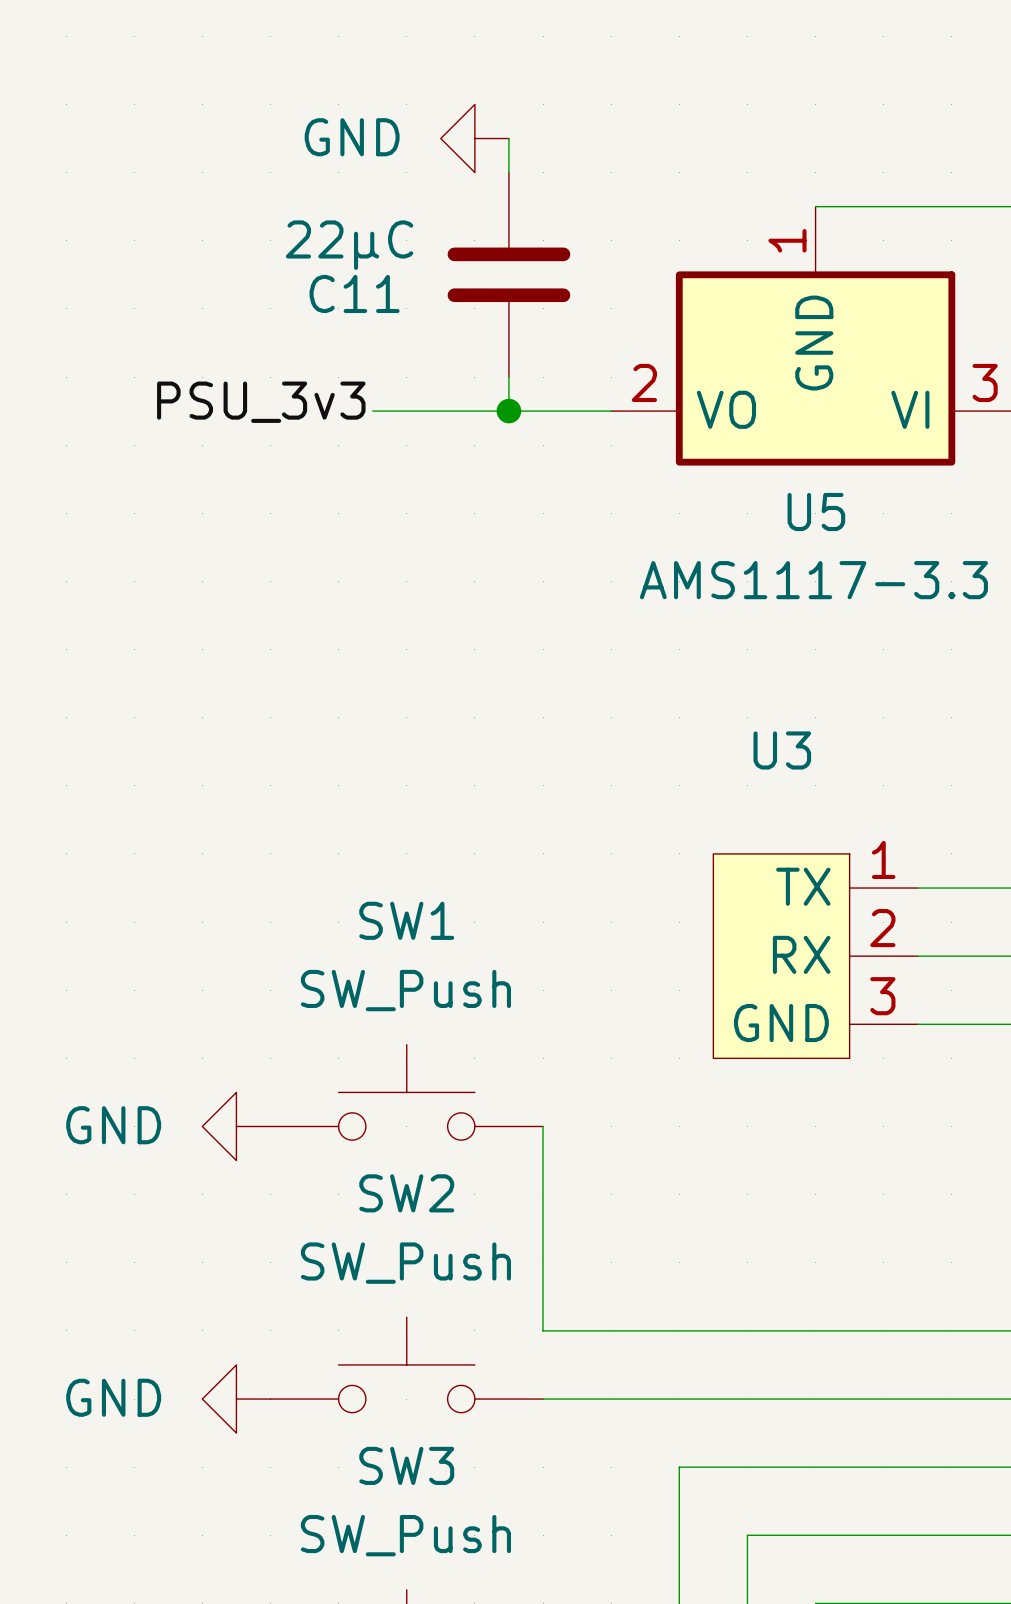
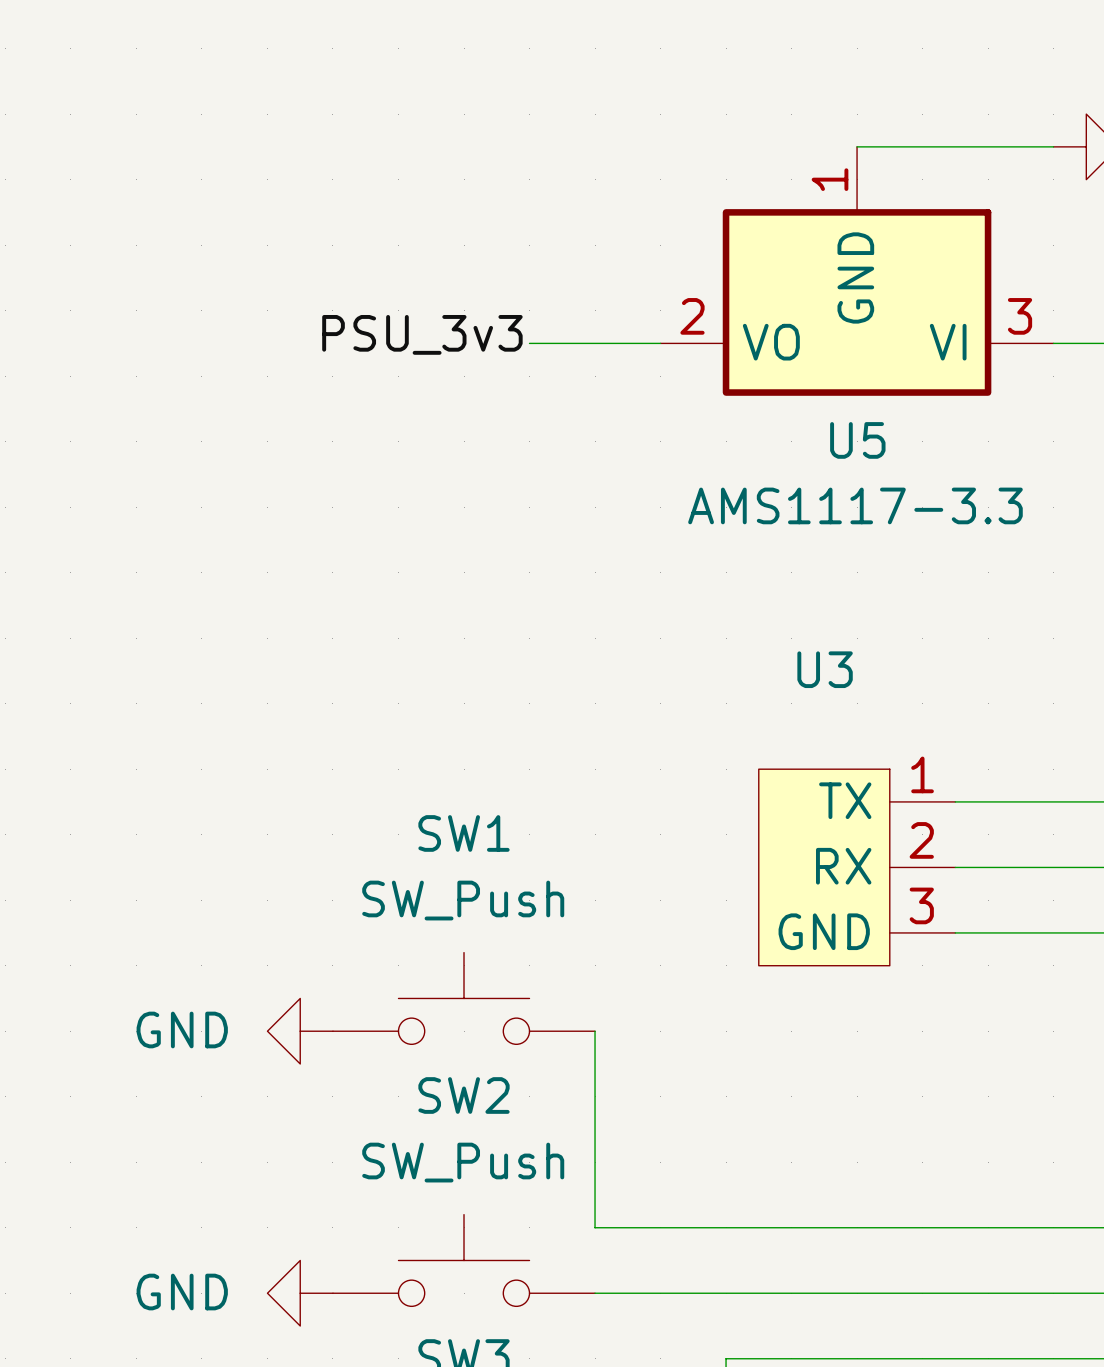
power symbol: GND (474, 138) -> none
wire: (508, 138) (508, 172) -> none
C11: 22μC (508, 274) -> none
wire: (508, 377) (508, 411) -> none
label position: PSU_3v3 (261, 402) -> PSU_3v3 (422, 334)
wire: (372, 411) (474, 411) -> none
junction: (508, 411) -> none

